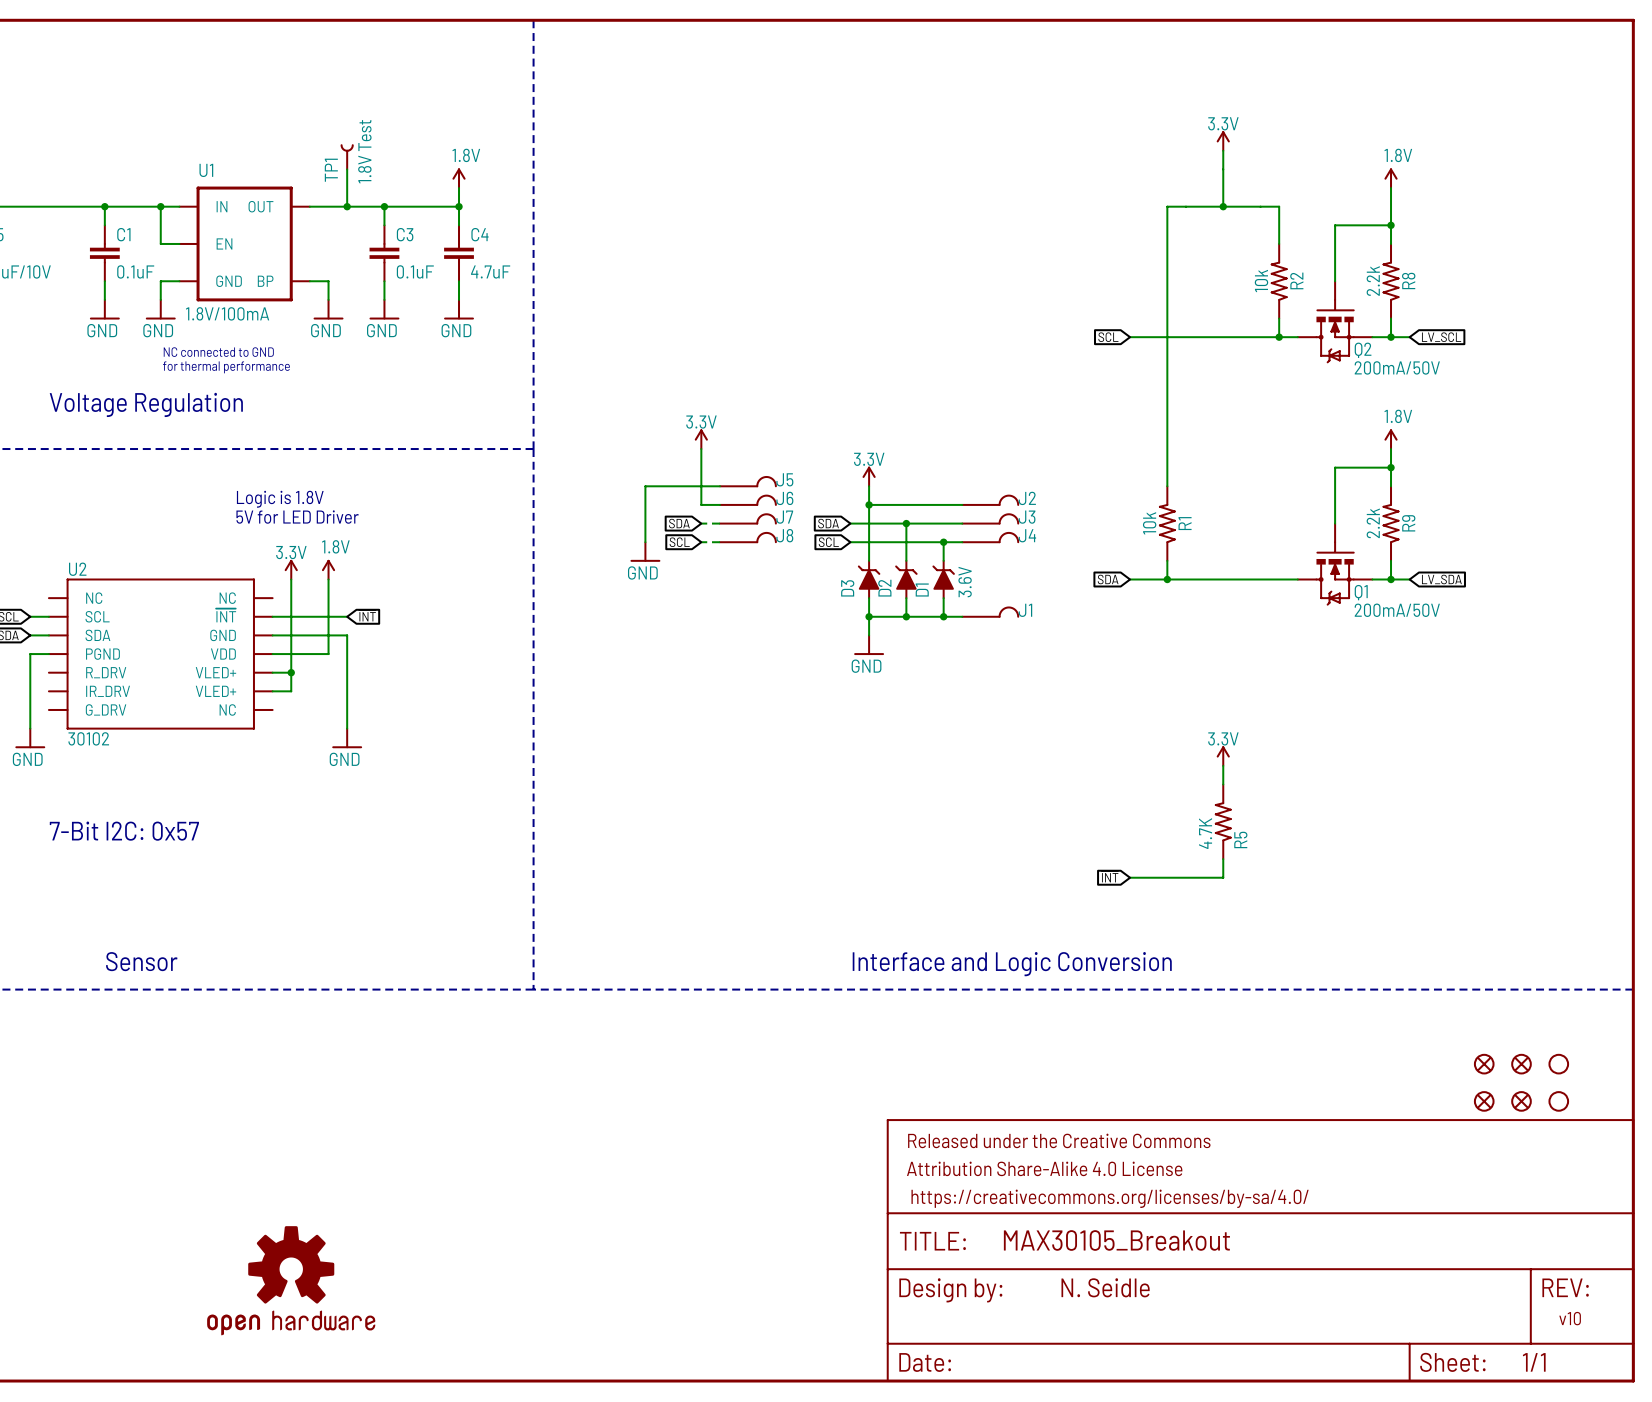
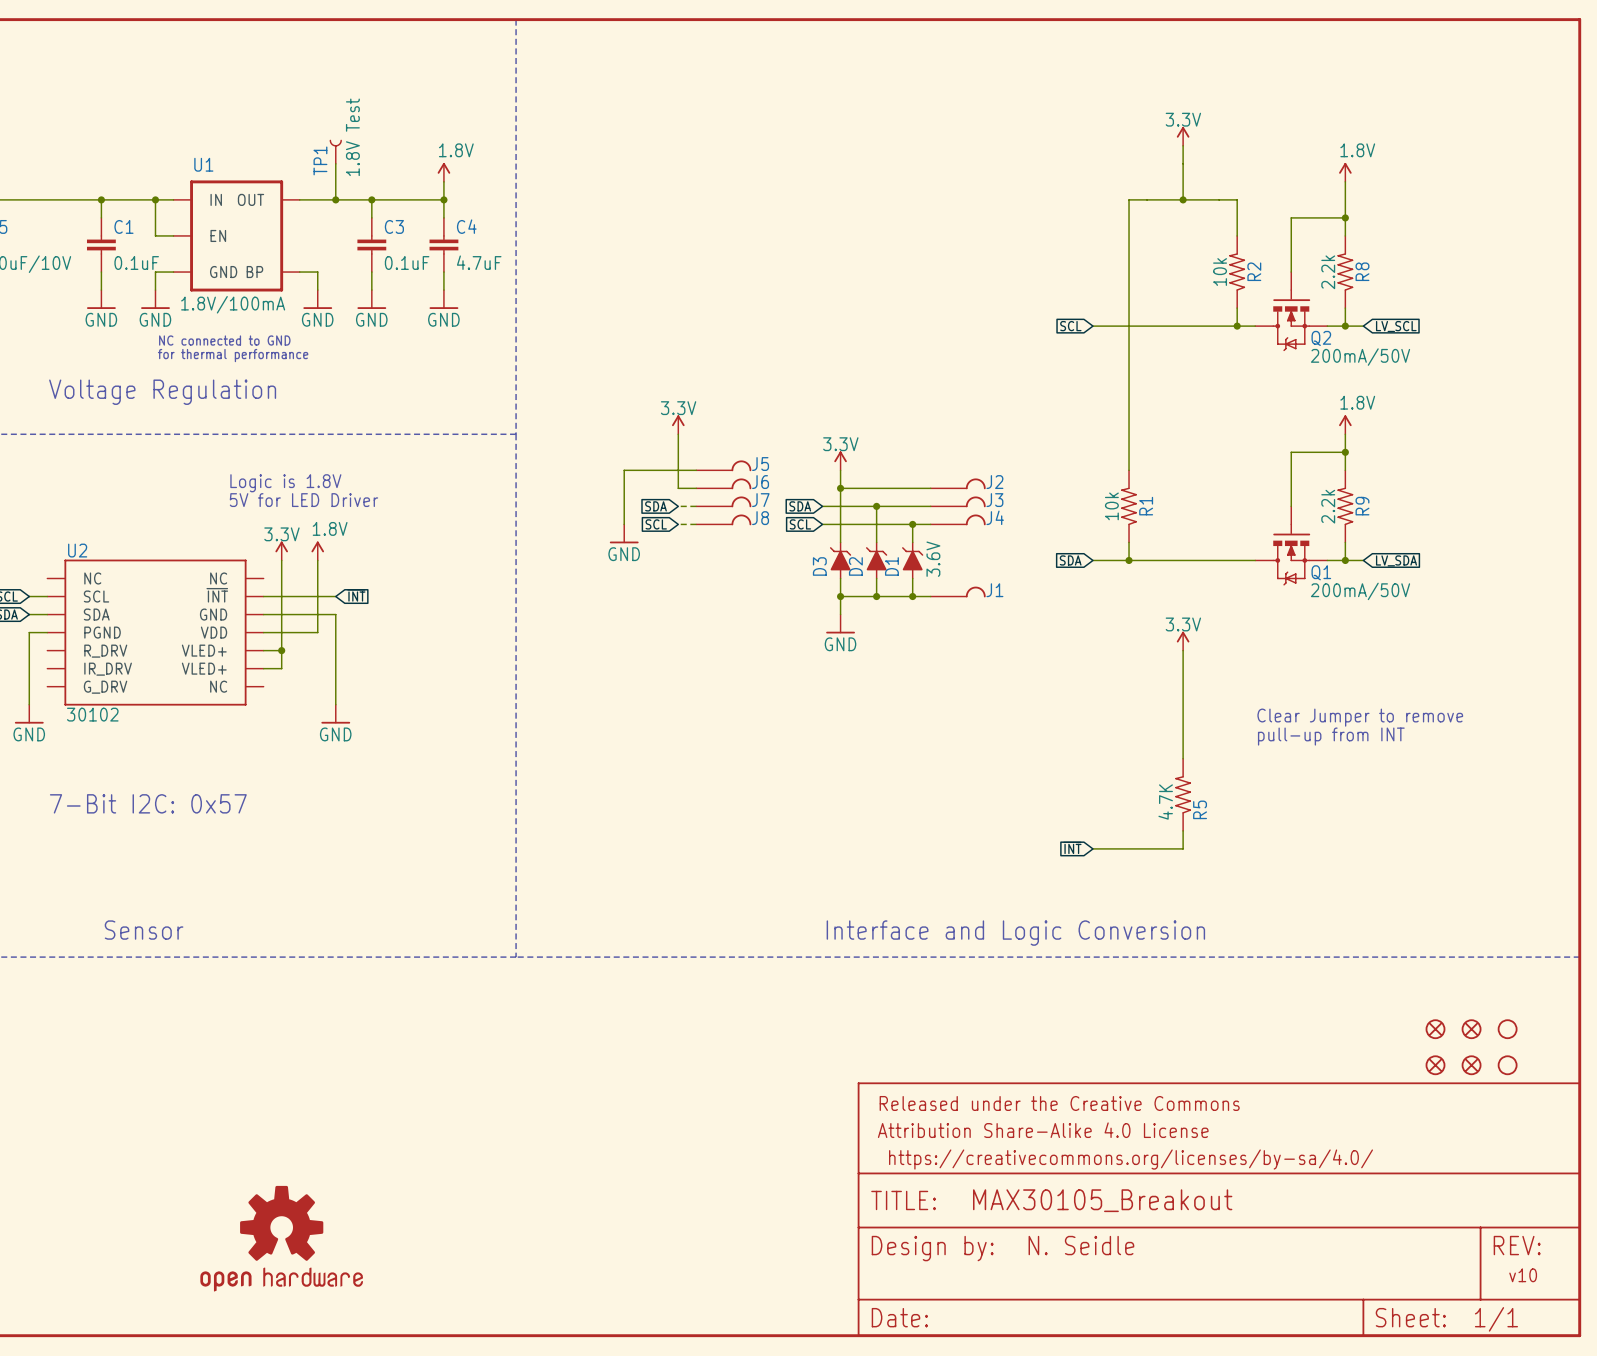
wire: none -> (1183, 650) (1183, 740)
text: none -> Clear Jumper to remove (1360, 717)
power symbol position: 3.3V (1223, 756) -> 3.3V (1183, 641)
text: none -> pull-up from INT (1331, 736)

